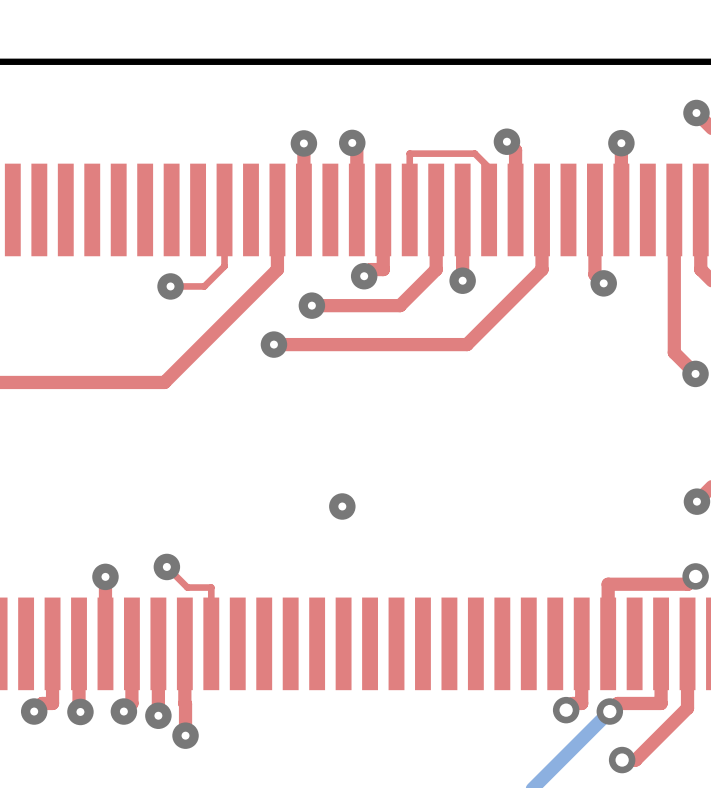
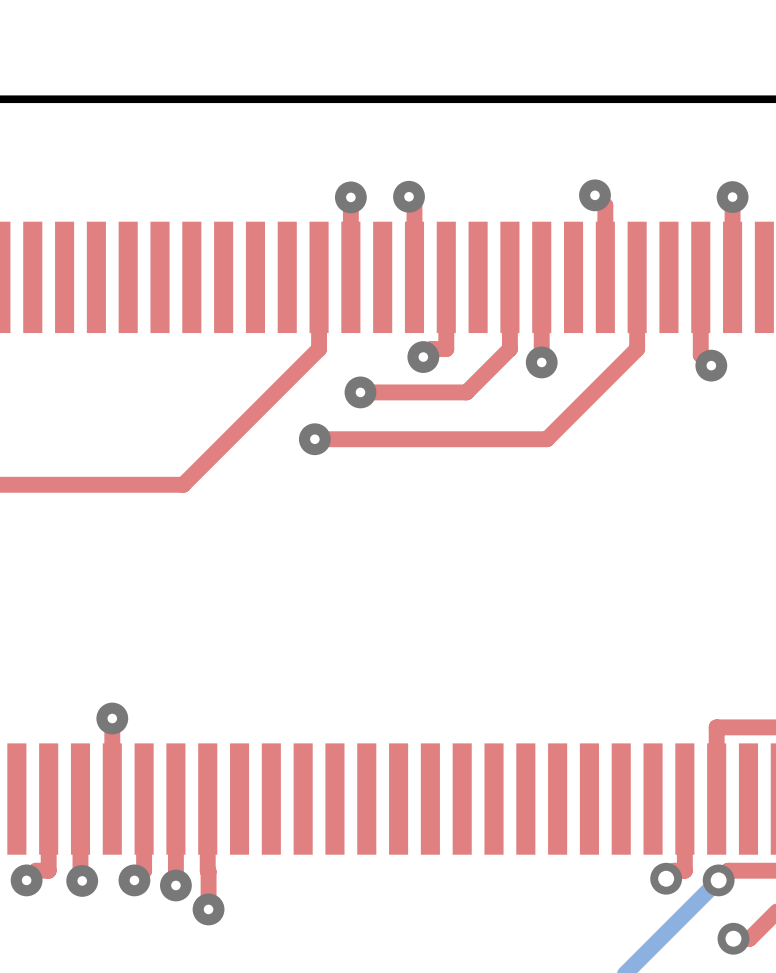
top track: (224, 209) (224, 266) (204, 286) (170, 286) -> none
top track: (409, 209) (409, 153) (474, 153) (489, 167) (489, 209) -> none
via: (170, 286) -> none
via: (342, 506) -> none
top track: (166, 566) (187, 587) (211, 587) (211, 643) -> none
via: (166, 566) -> none

